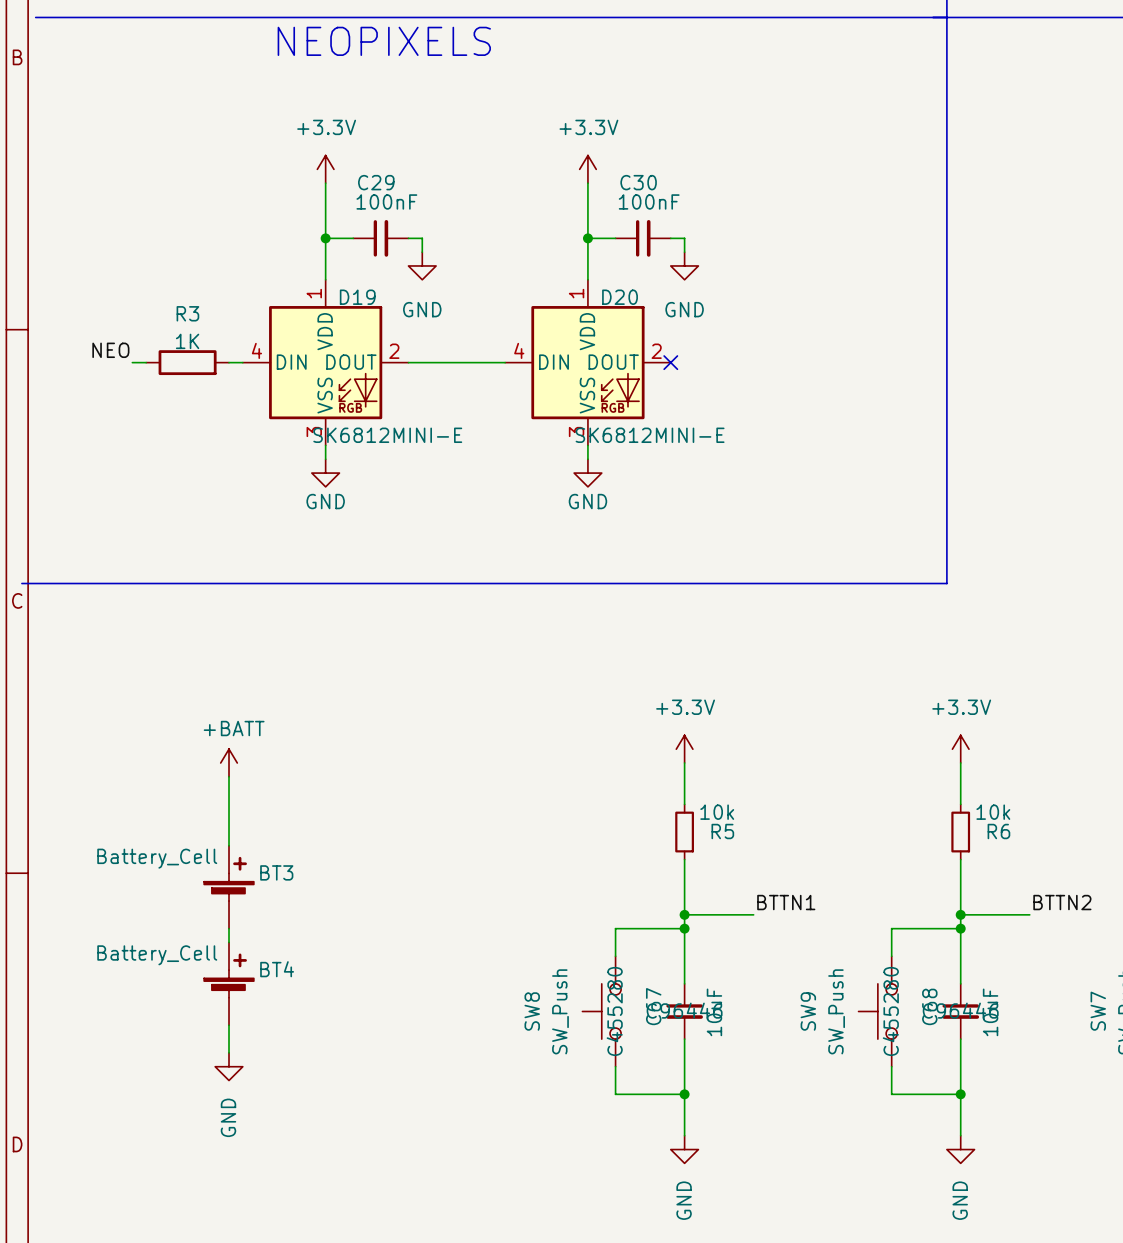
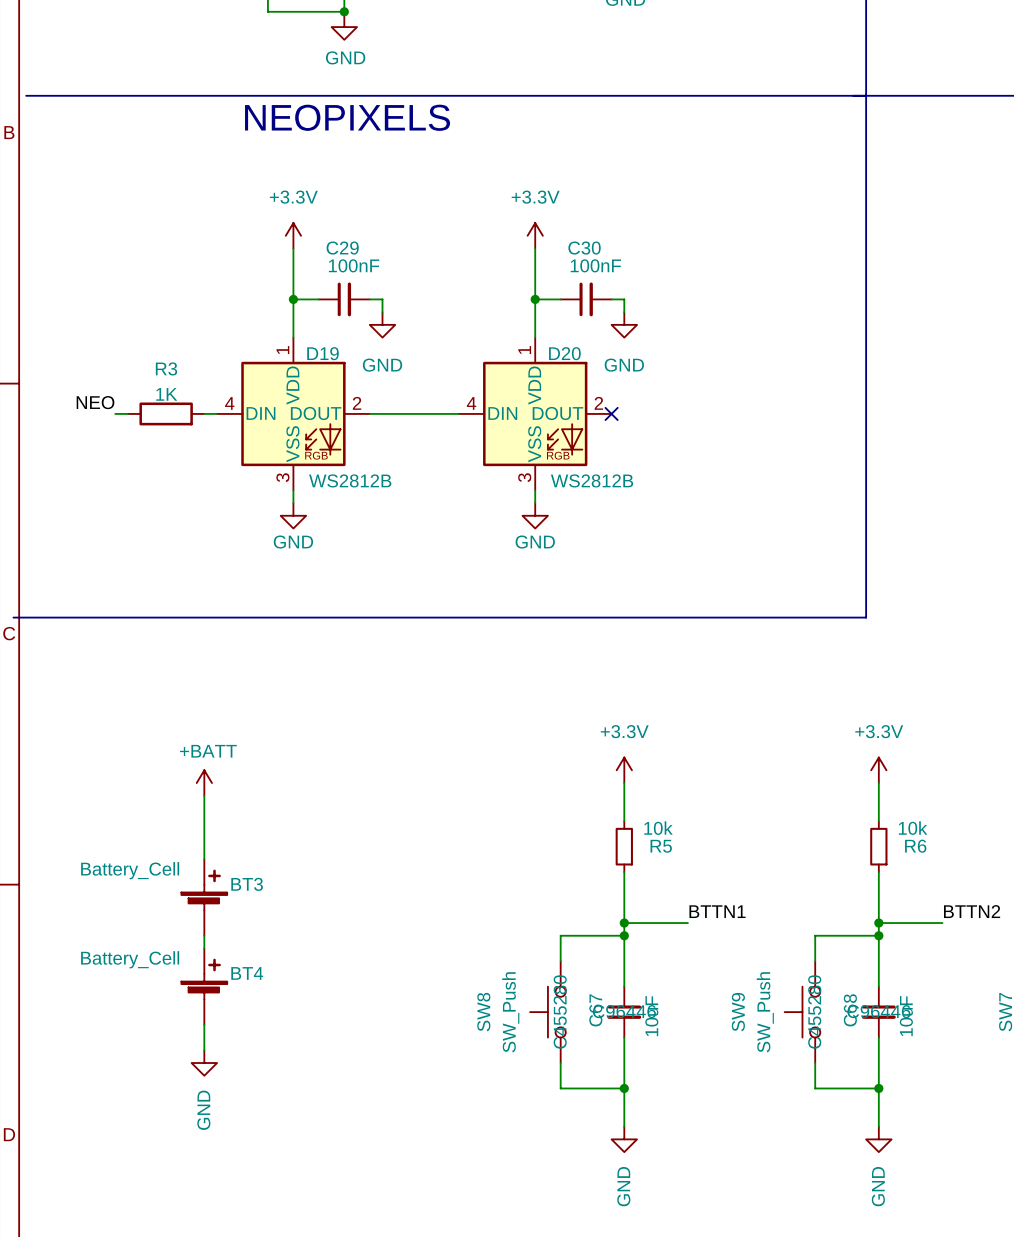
D19 value: SK6812MINI-E (387, 435) -> WS2812B (350, 480)
D20 value: SK6812MINI-E (650, 435) -> WS2812B (592, 480)

